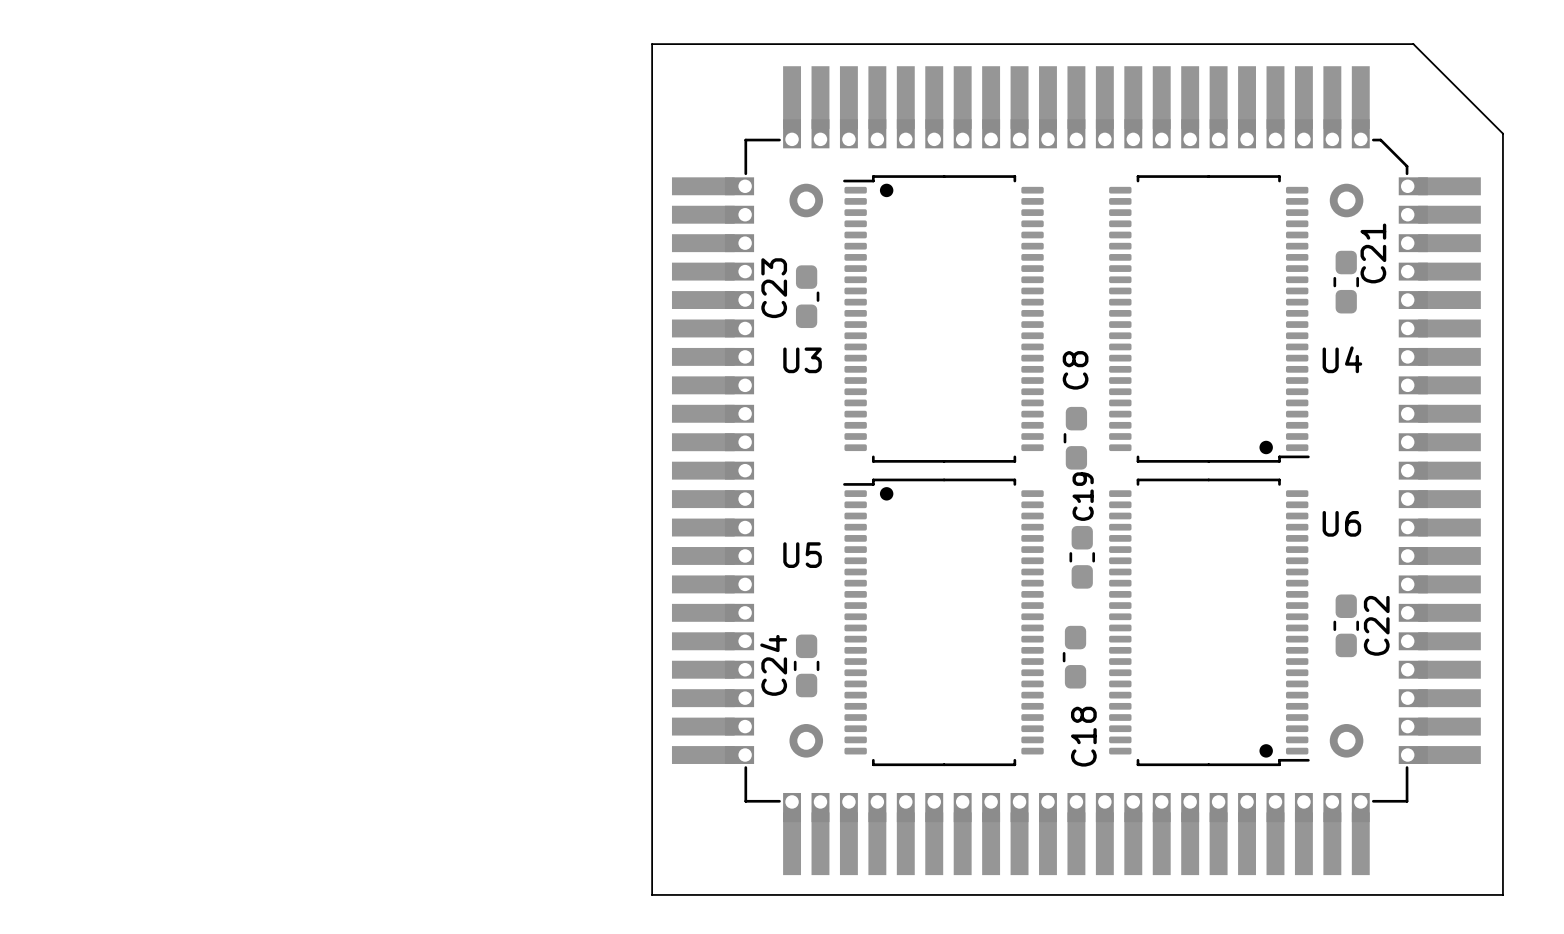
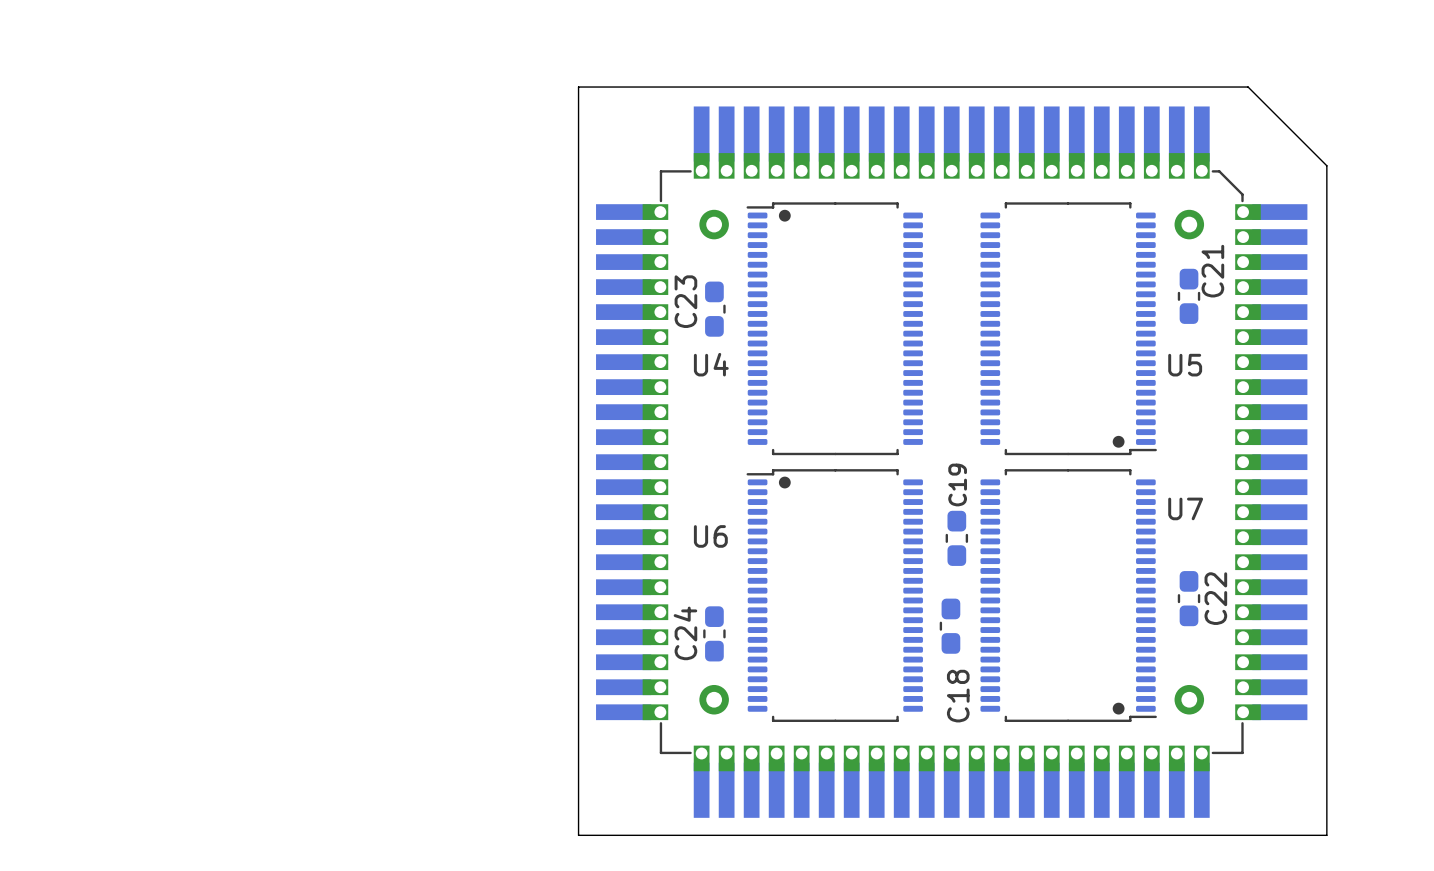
U4 name: U4 (1342, 359) -> U5 (1185, 365)
U3 name: U3 (802, 360) -> U4 (711, 364)
C8: (1075, 438) -> none
U6 name: U6 (1341, 523) -> U7 (1185, 508)
U5 name: U5 (802, 555) -> U6 (710, 536)

